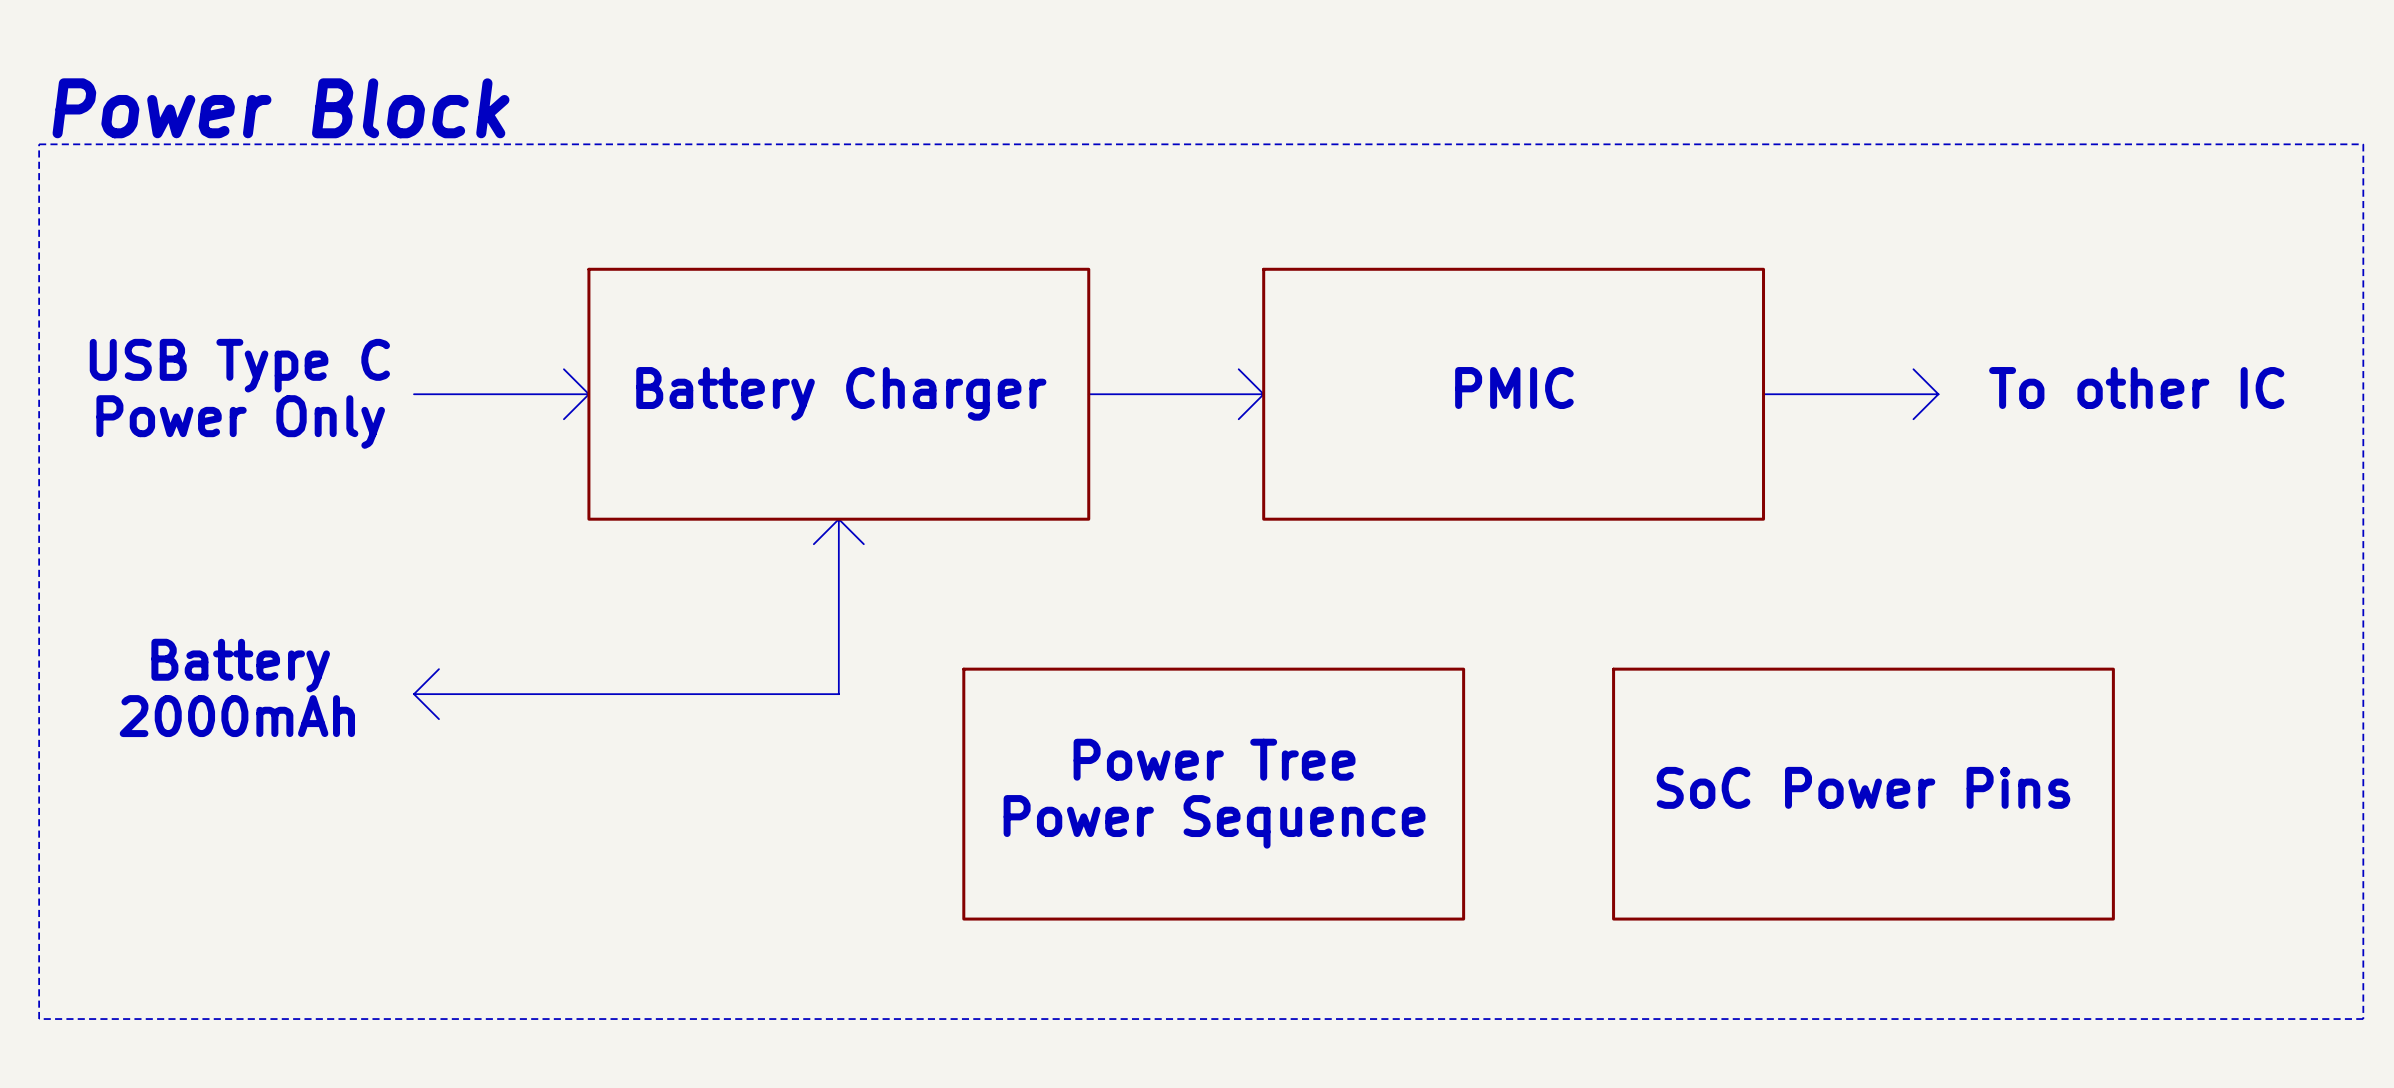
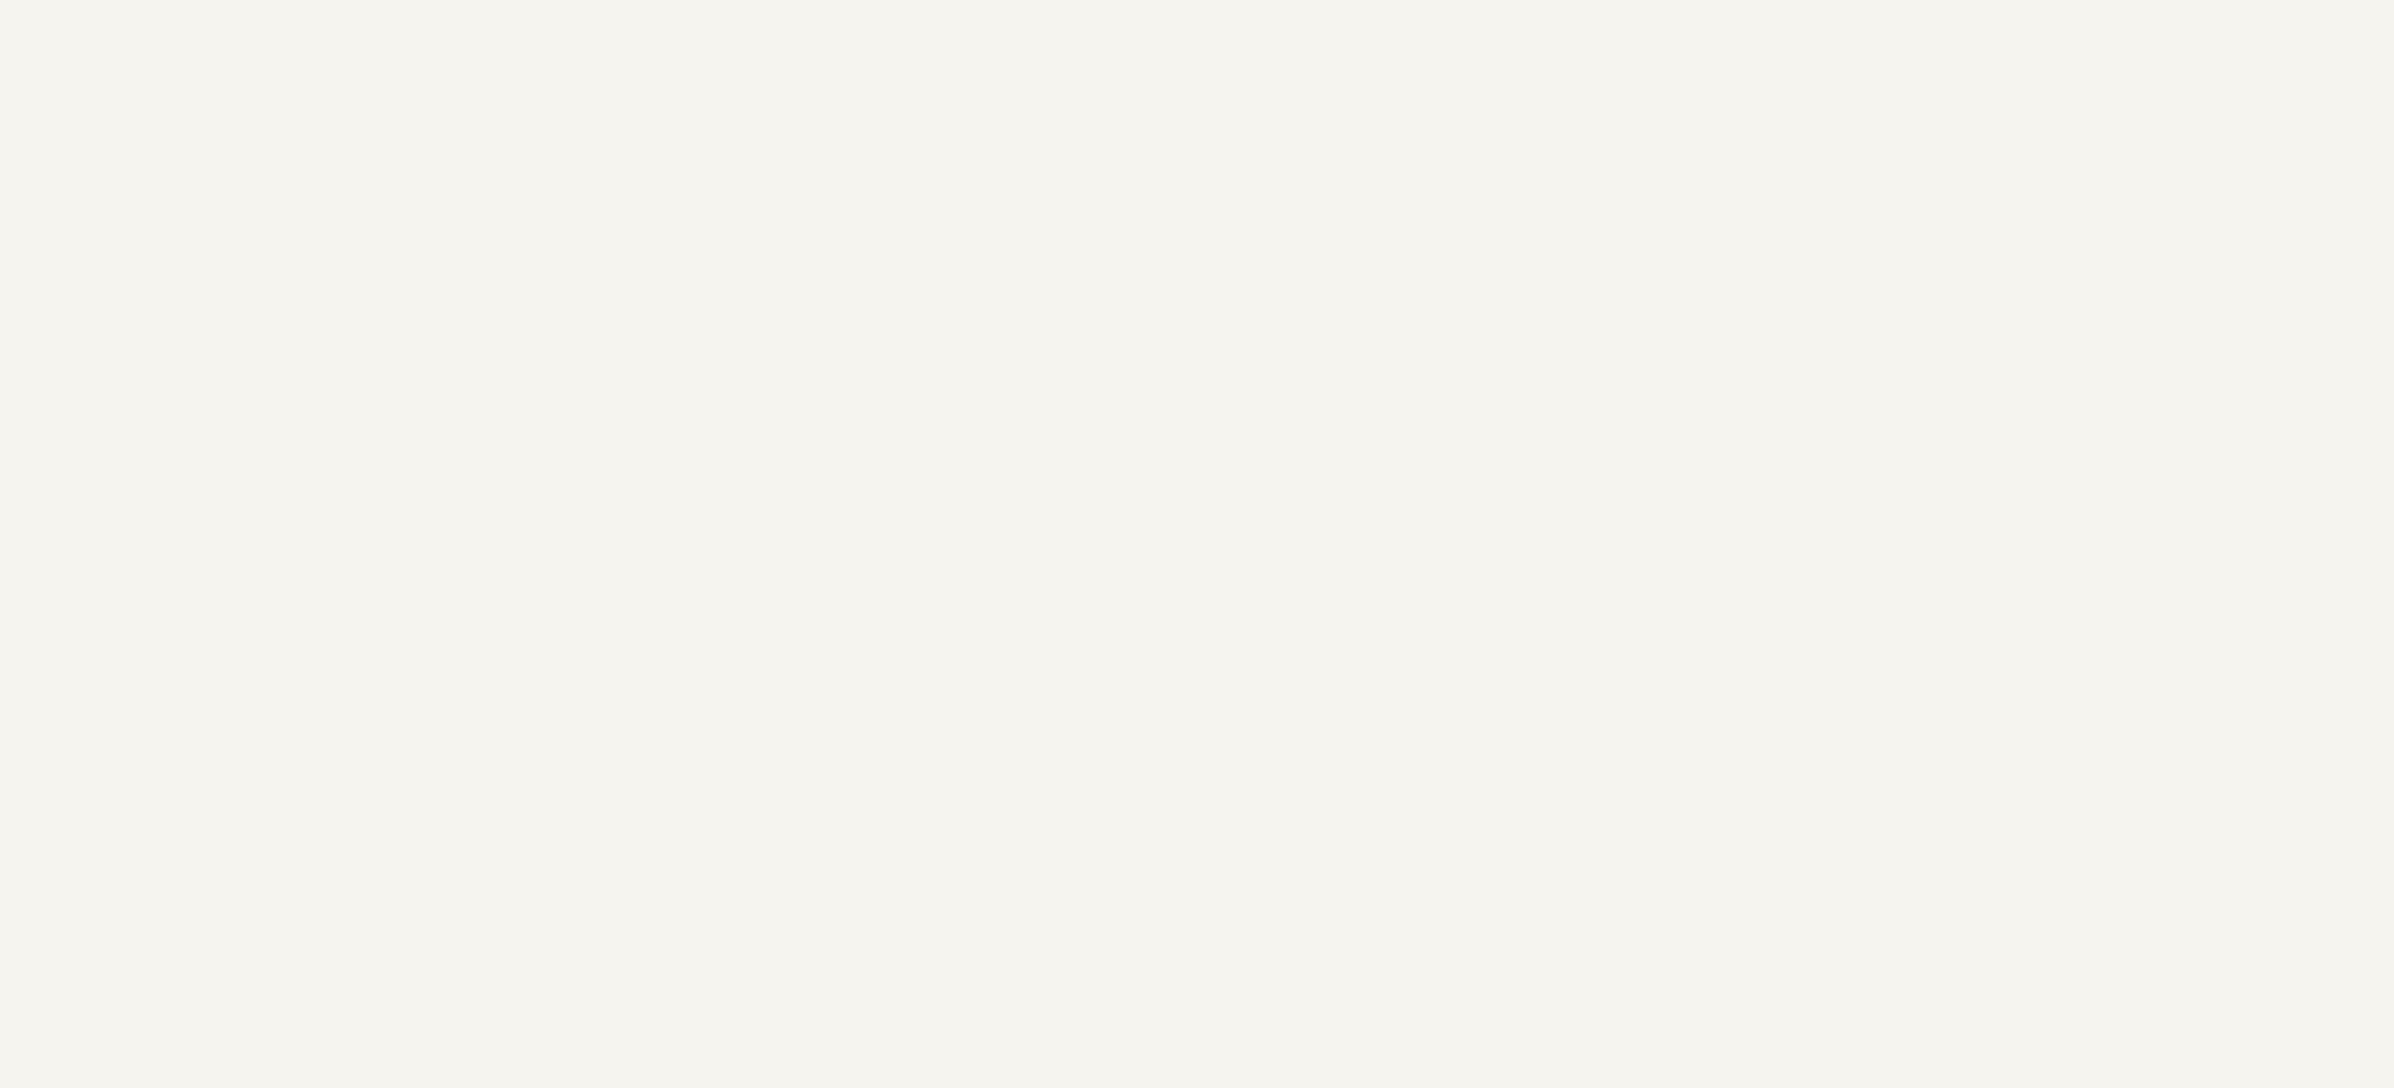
text: Power Block (281, 108) -> none
line: (39, 144) (2363, 144) (2363, 1019) (39, 1019) (39, 144) -> none
text: USB Type C (239, 365) -> none
line: (563, 369) (588, 394) -> none
line: (1238, 369) (1263, 394) -> none
line: (1913, 369) (1938, 394) -> none
text: PMIC (1514, 388) -> none
text: To other IC (2136, 388) -> none
text: Battery Charger (841, 393) -> none
line: (413, 394) (588, 394) -> none
line: (588, 394) (563, 419) -> none
sheet: (838, 394) -> none
line: (1088, 394) (1263, 394) -> none
line: (1263, 394) (1238, 419) -> none
sheet: (1513, 394) -> none
line: (1763, 394) (1938, 394) -> none
line: (1938, 394) (1913, 419) -> none
text: Power Only (240, 422) -> none
line: (838, 519) (813, 544) -> none
line: (838, 519) (863, 544) -> none
line: (838, 519) (838, 694) (413, 694) -> none
text: Battery (240, 665) -> none
line: (438, 669) (413, 694) -> none
line: (413, 694) (438, 719) -> none
text: 2000mAh (237, 716) -> none
text: Power Tree (1214, 759) -> none
text: SoC Power Pins (1863, 787) -> none
sheet: (1213, 794) -> none
sheet: (1863, 794) -> none
text: Power Sequence (1214, 821) -> none

